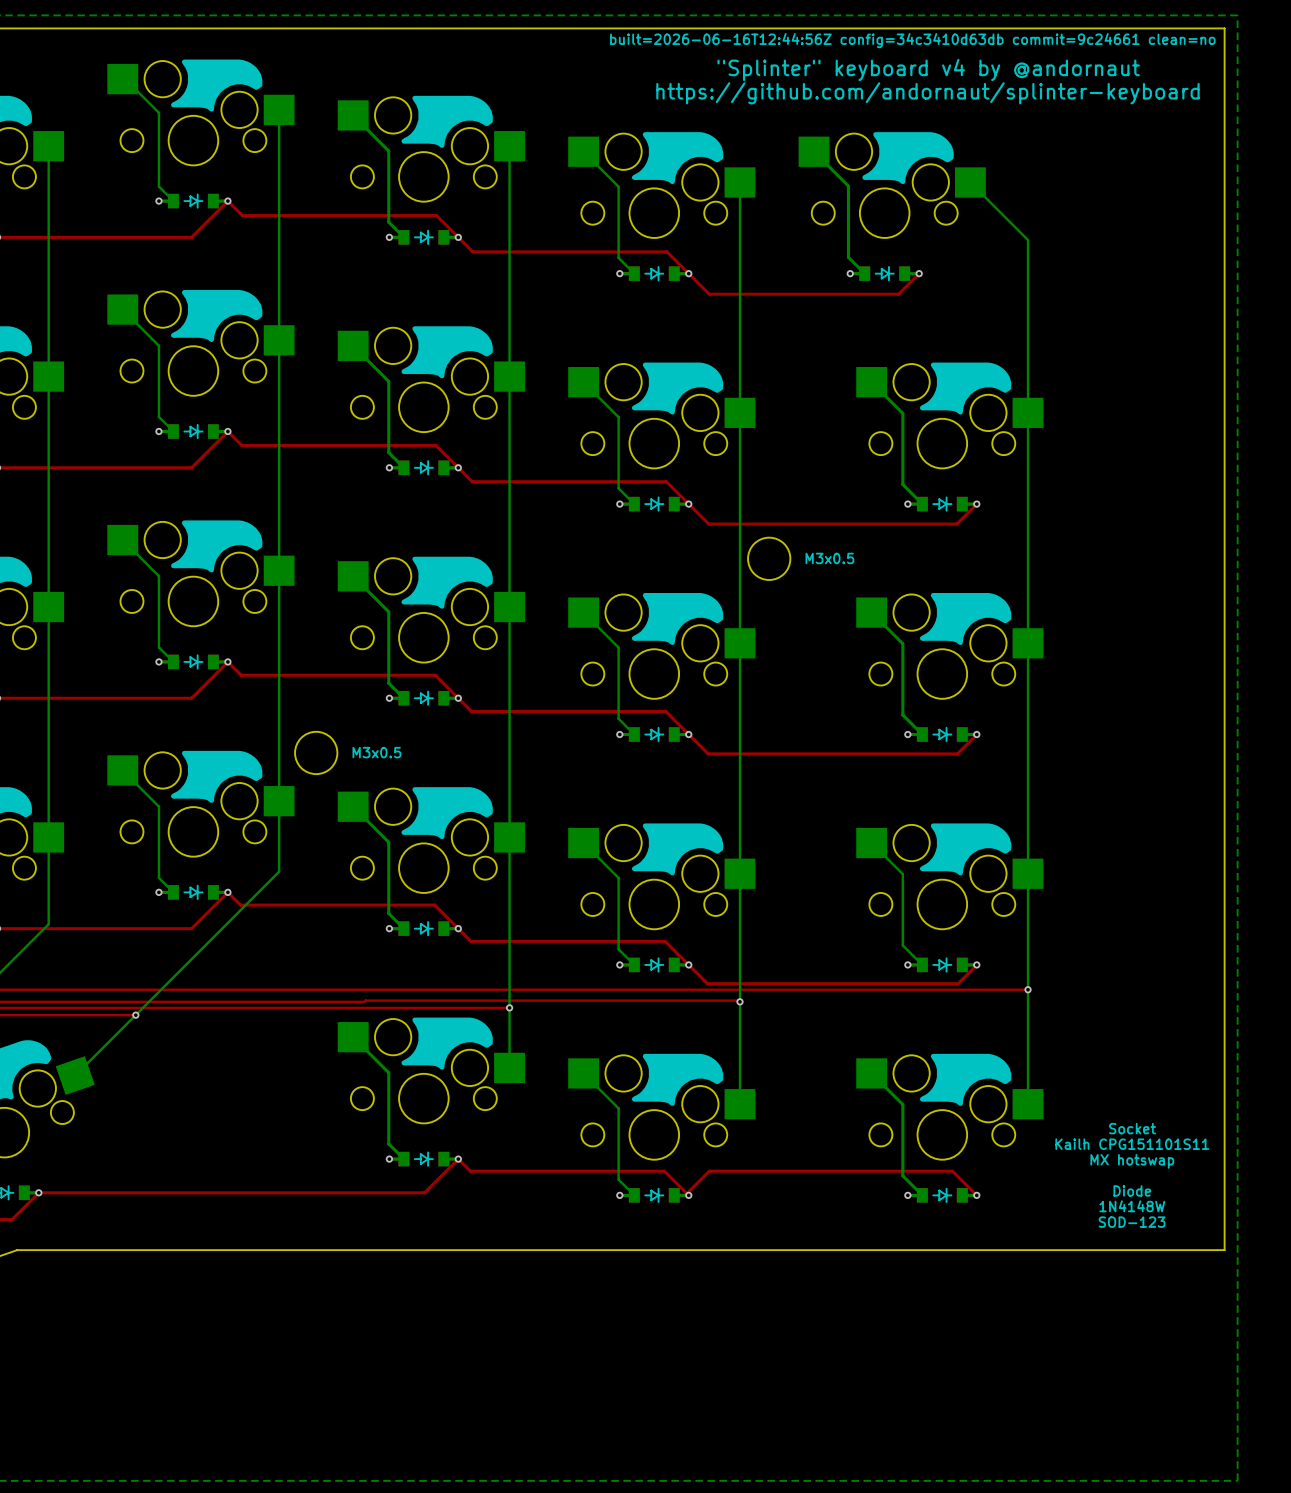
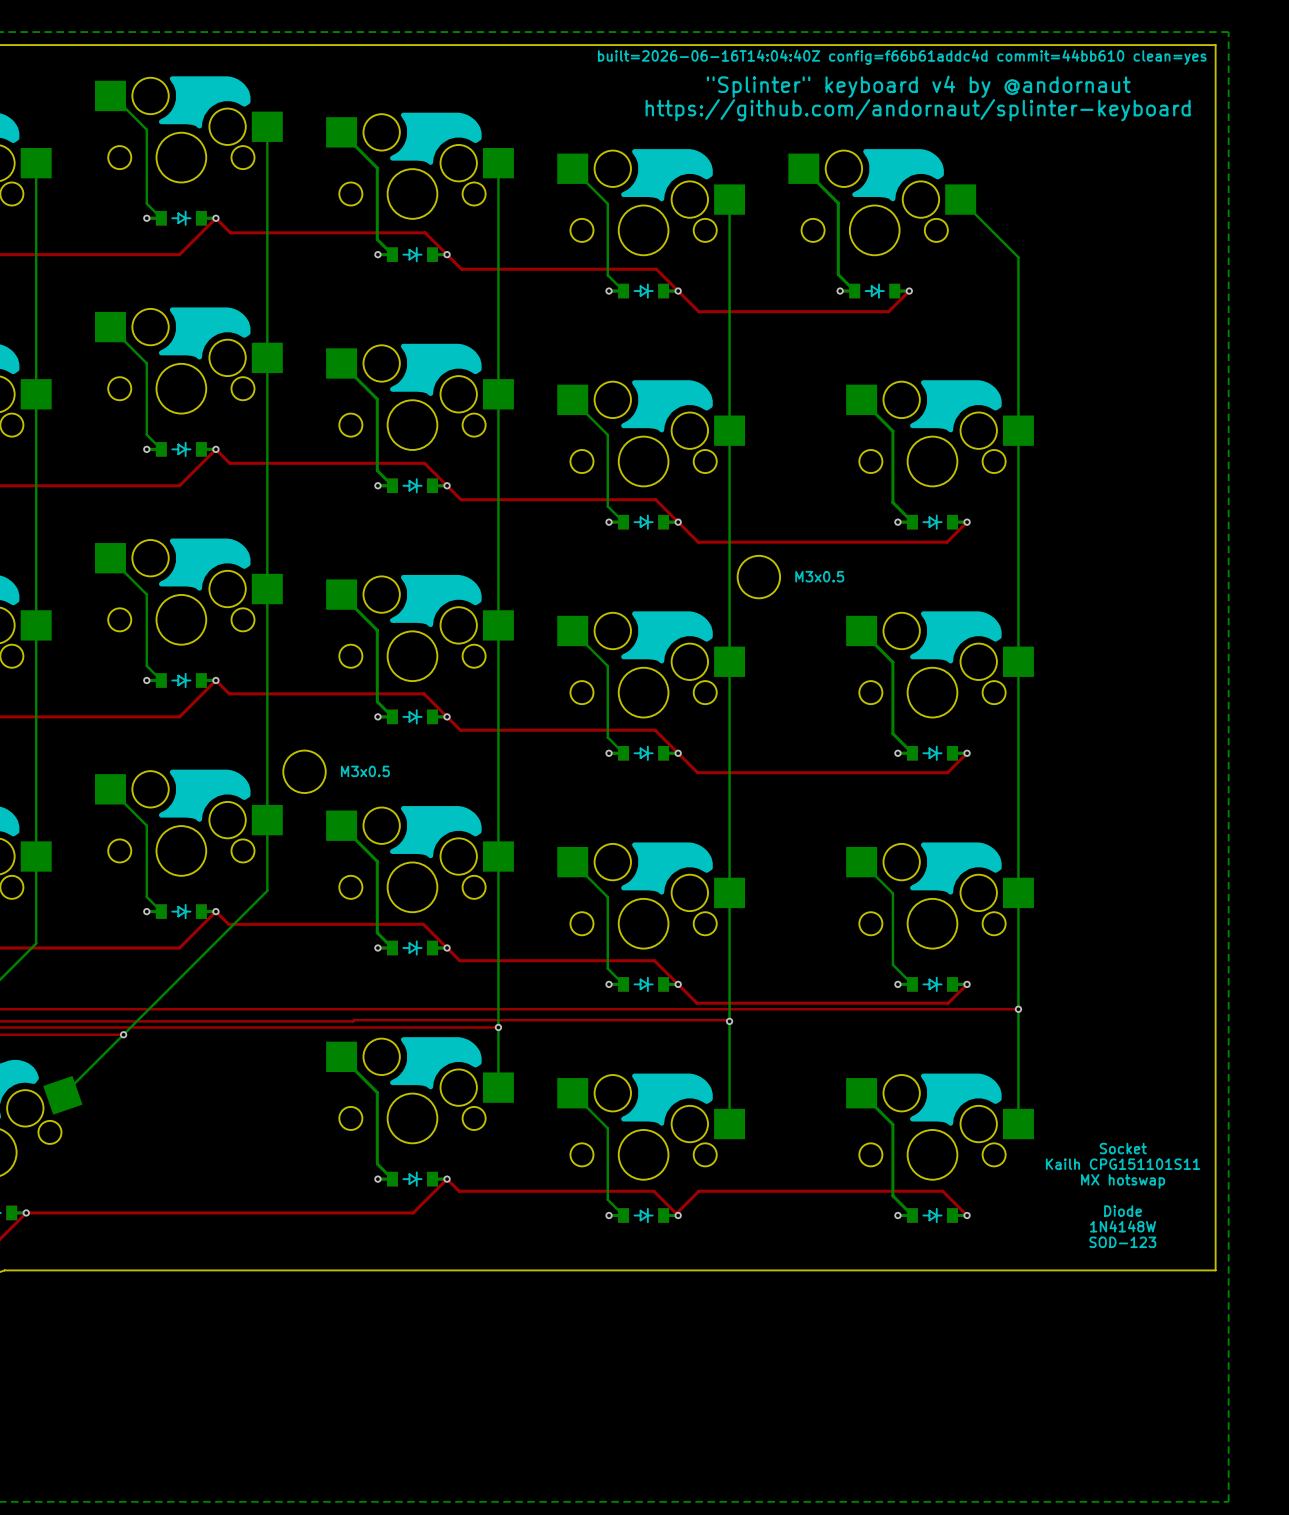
text: built=2026-06-16T12:44:56Z config=34c3410d63db commit=9c24661 clean=no (912, 40) -> built=2026-06-16T14:04:40Z config=f66b61addc4d commit=44bb610 clean=yes (902, 57)

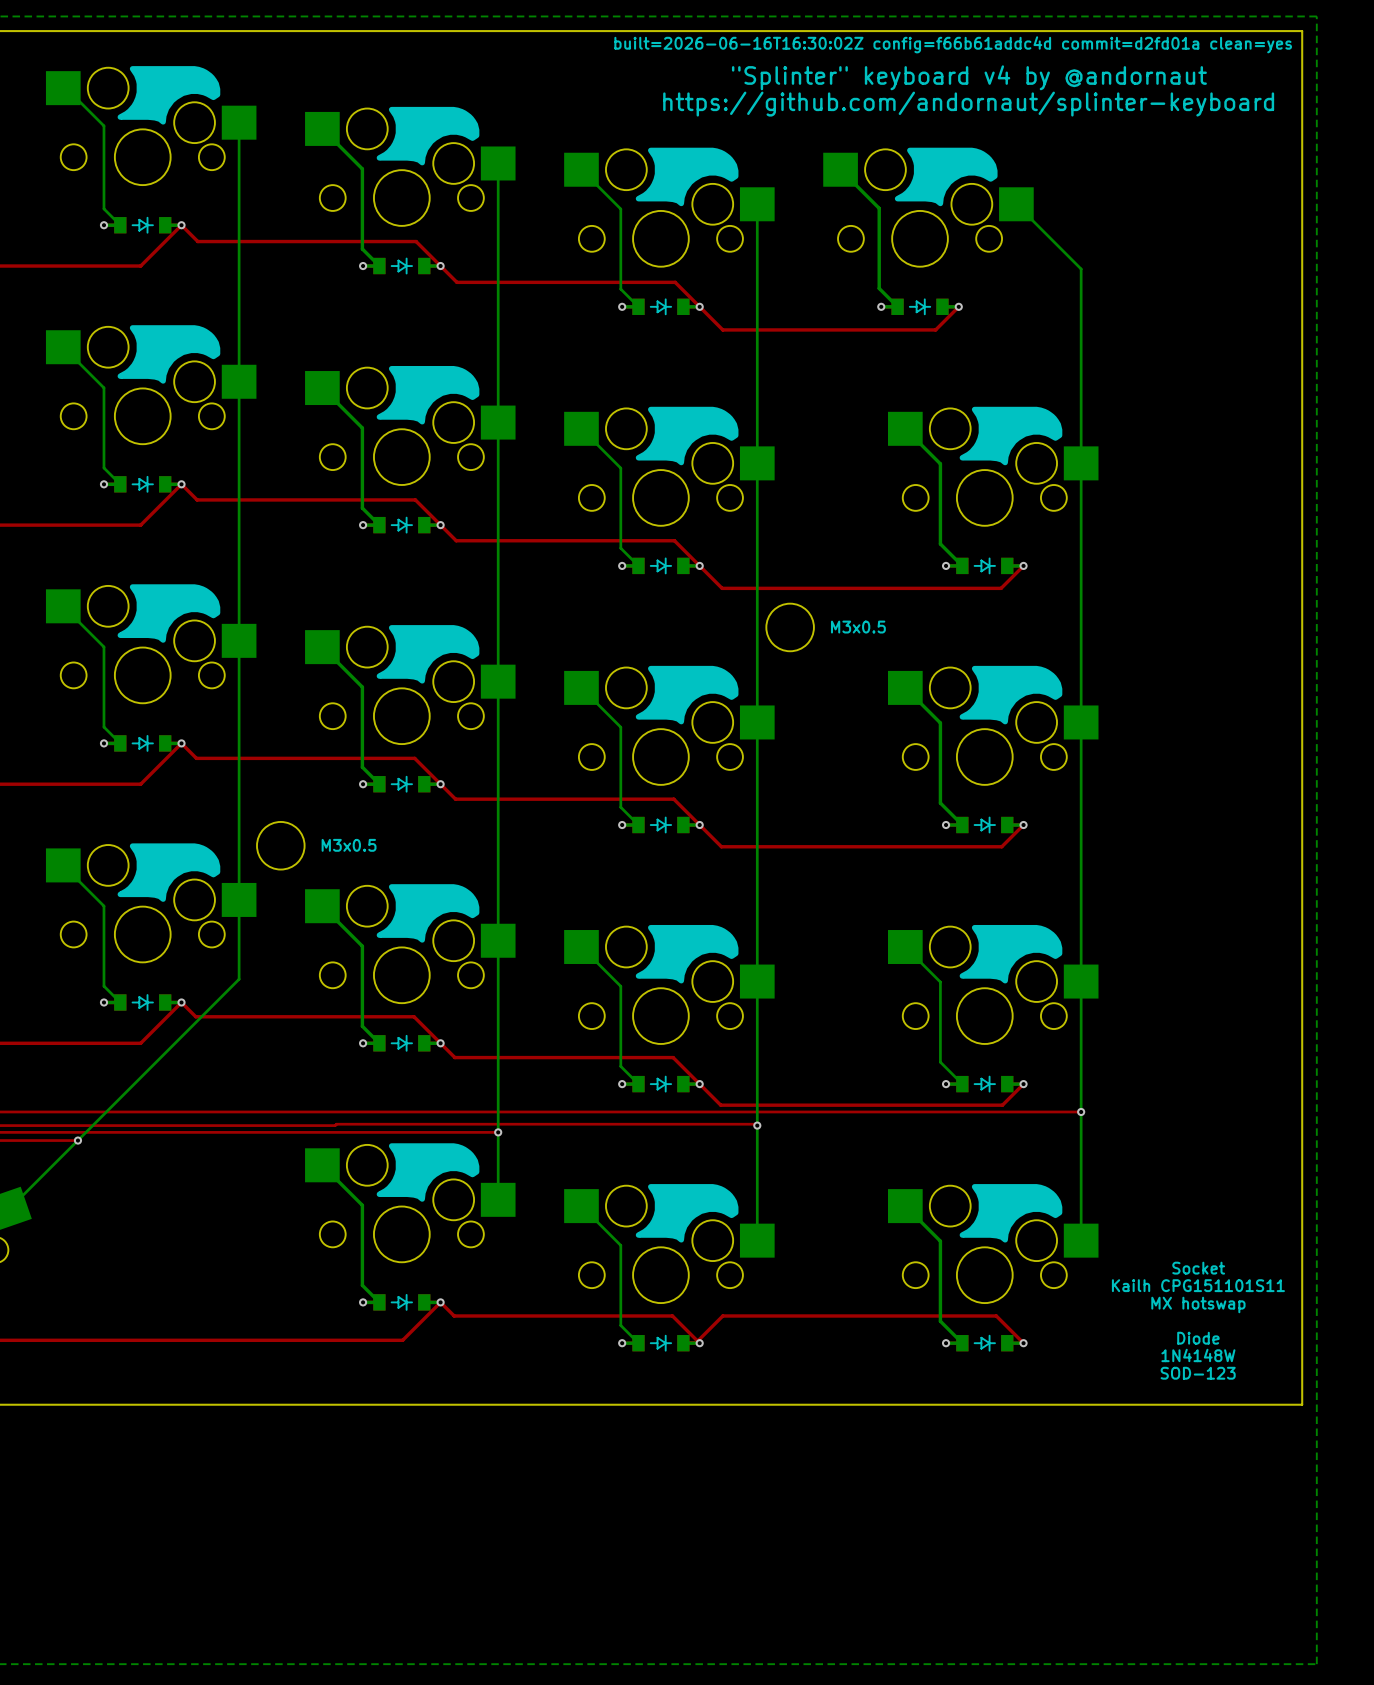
text: built=2026-06-16T14:04:40Z config=f66b61addc4d commit=44bb610 clean=yes (902, 57) -> built=2026-06-16T16:30:02Z config=f66b61addc4d commit=d2fd01a clean=yes (953, 44)

